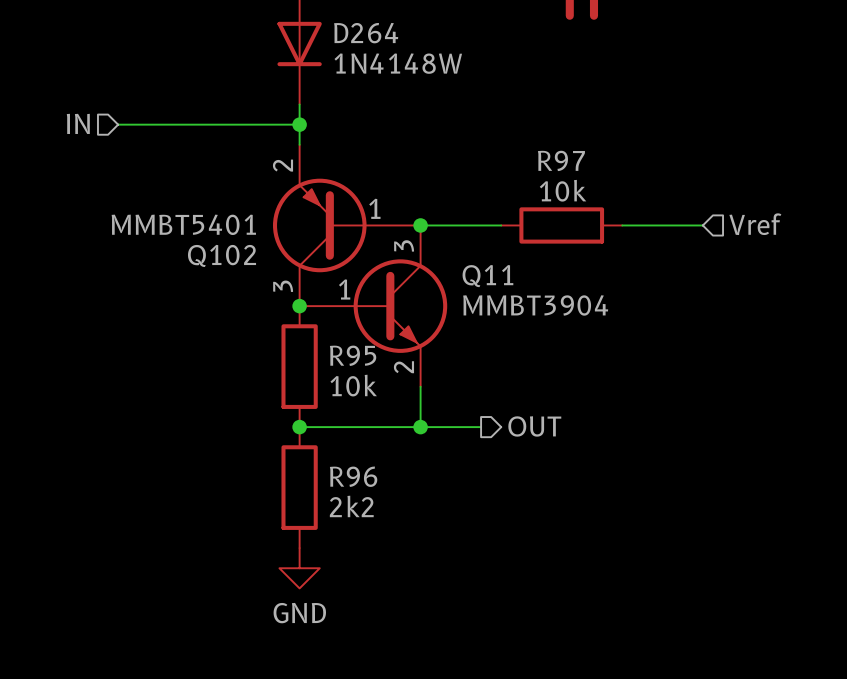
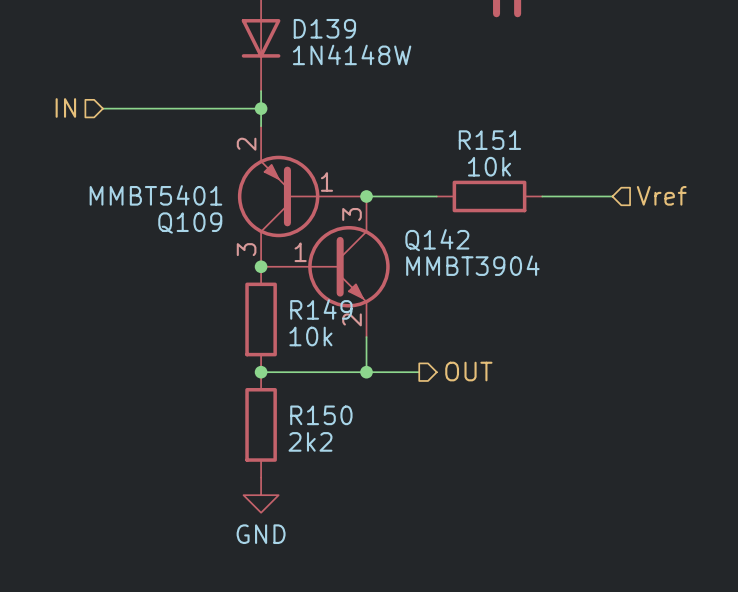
D264 name: D264 (366, 33) -> D139 (324, 28)
R97 name: R97 (561, 160) -> R151 (489, 140)
Q102 name: Q102 (222, 255) -> Q109 (190, 223)
Q11 name: Q11 (487, 276) -> Q142 (437, 240)
R95 name: R95 (353, 355) -> R149 (321, 309)
R96 name: R96 (353, 476) -> R150 (321, 415)

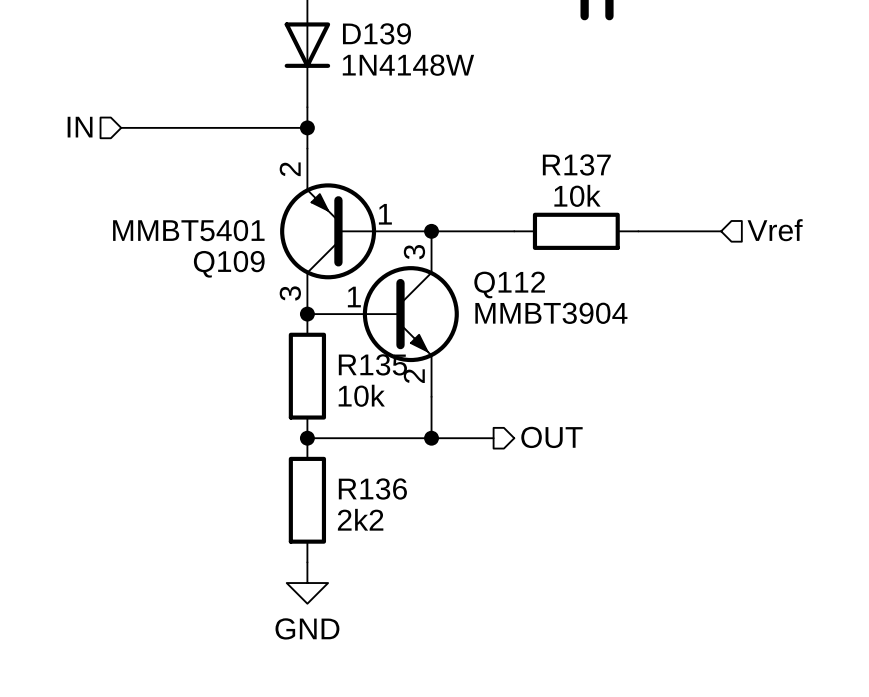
R151 name: R151 (489, 140) -> R137 (576, 164)
Q142 name: Q142 (437, 240) -> Q112 (509, 284)
R149 name: R149 (321, 309) -> R135 (372, 364)
R150 name: R150 (321, 415) -> R136 (372, 489)

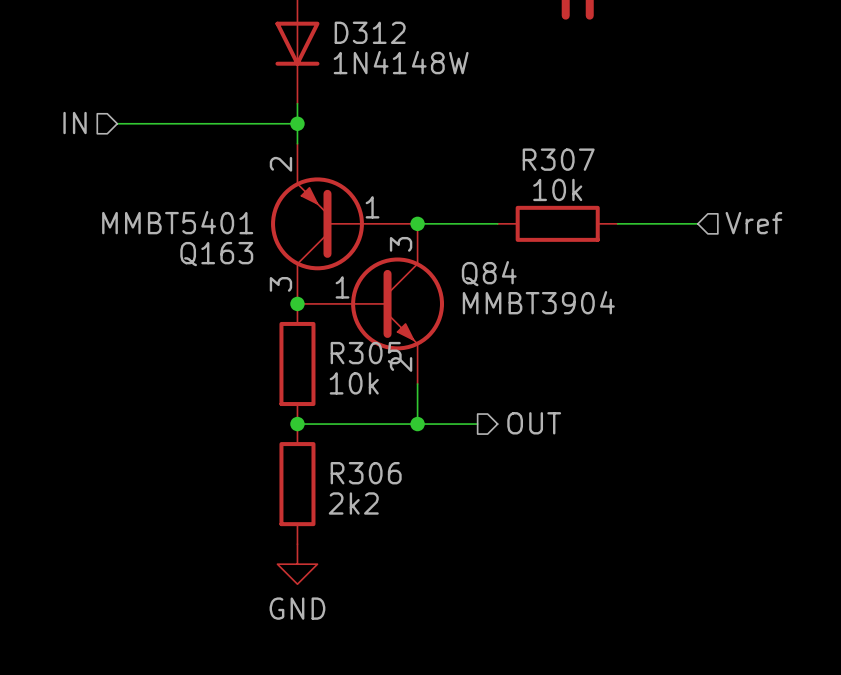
D139 name: D139 (376, 33) -> D312 (370, 32)
R137 name: R137 (576, 164) -> R307 (558, 159)
Q109 name: Q109 (229, 264) -> Q163 (216, 254)
Q112 name: Q112 (509, 284) -> Q84 (489, 273)
R135 name: R135 (372, 364) -> R305 (366, 353)
R136 name: R136 (372, 489) -> R306 (366, 473)

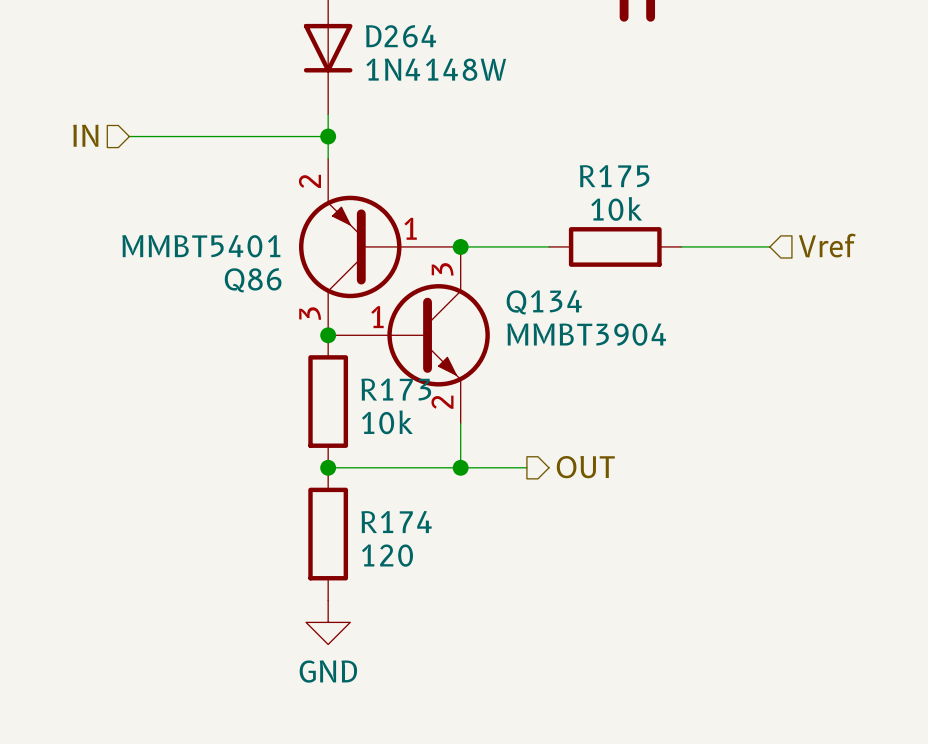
D312 name: D312 (370, 32) -> D264 (401, 36)
R307 name: R307 (558, 159) -> R175 (614, 176)
Q163 name: Q163 (216, 254) -> Q86 (253, 280)
Q84 name: Q84 (489, 273) -> Q134 (544, 302)
R305 name: R305 (366, 353) -> R173 (396, 389)
R306 name: R306 (366, 473) -> R174 (396, 522)
R306 value: 2k2 (353, 503) -> 120 (387, 555)

